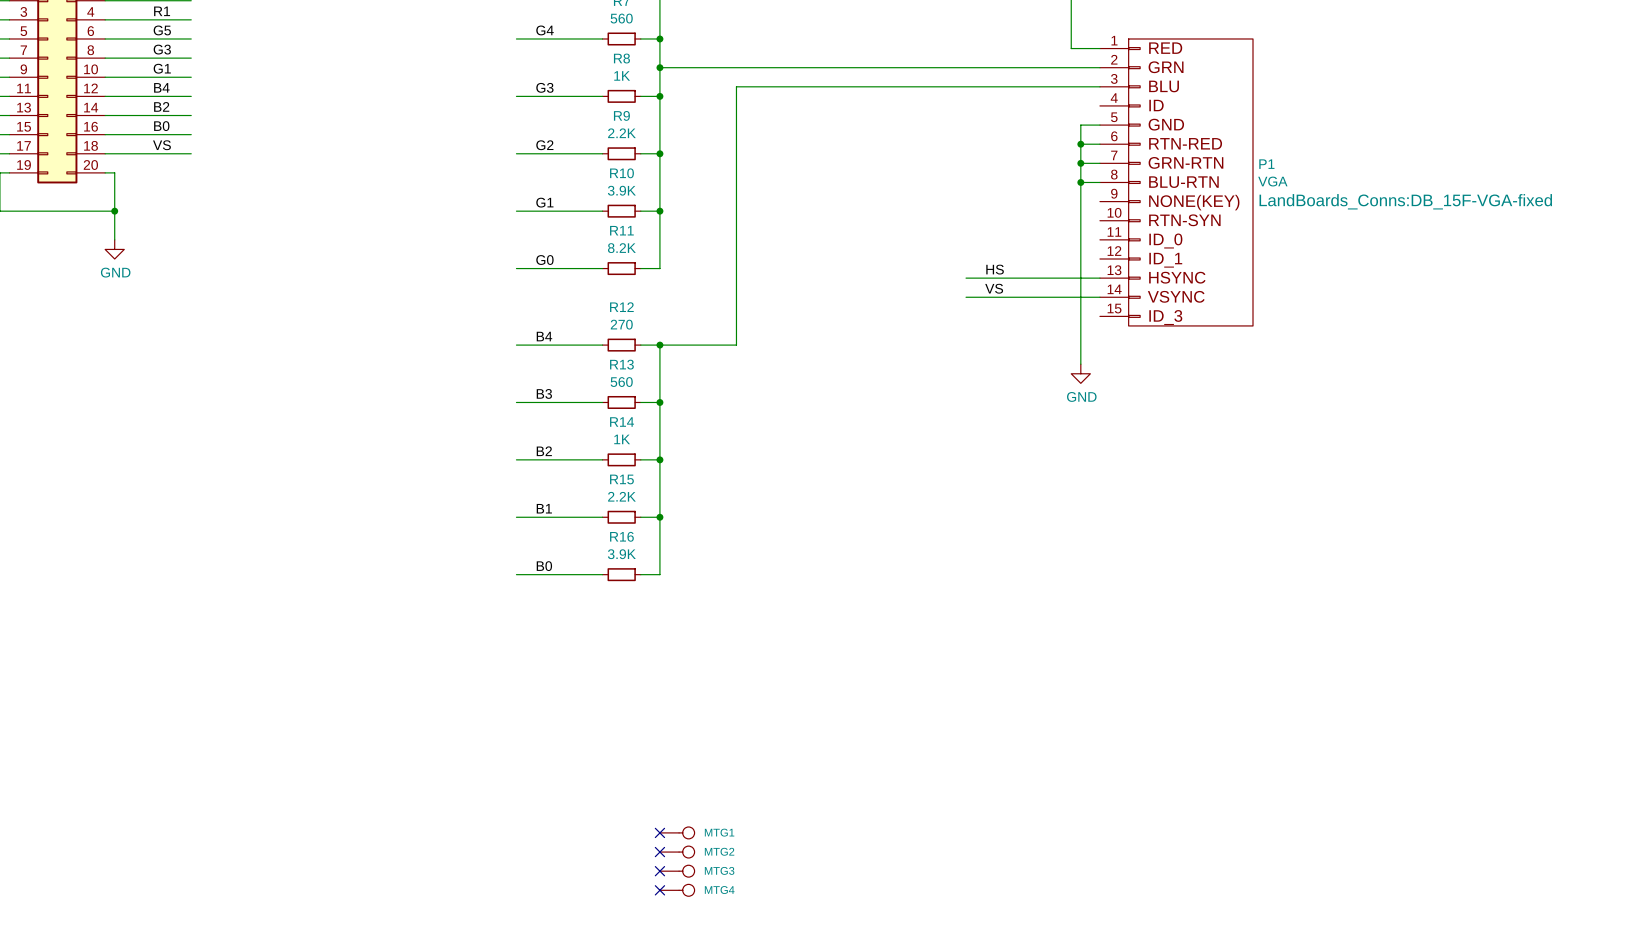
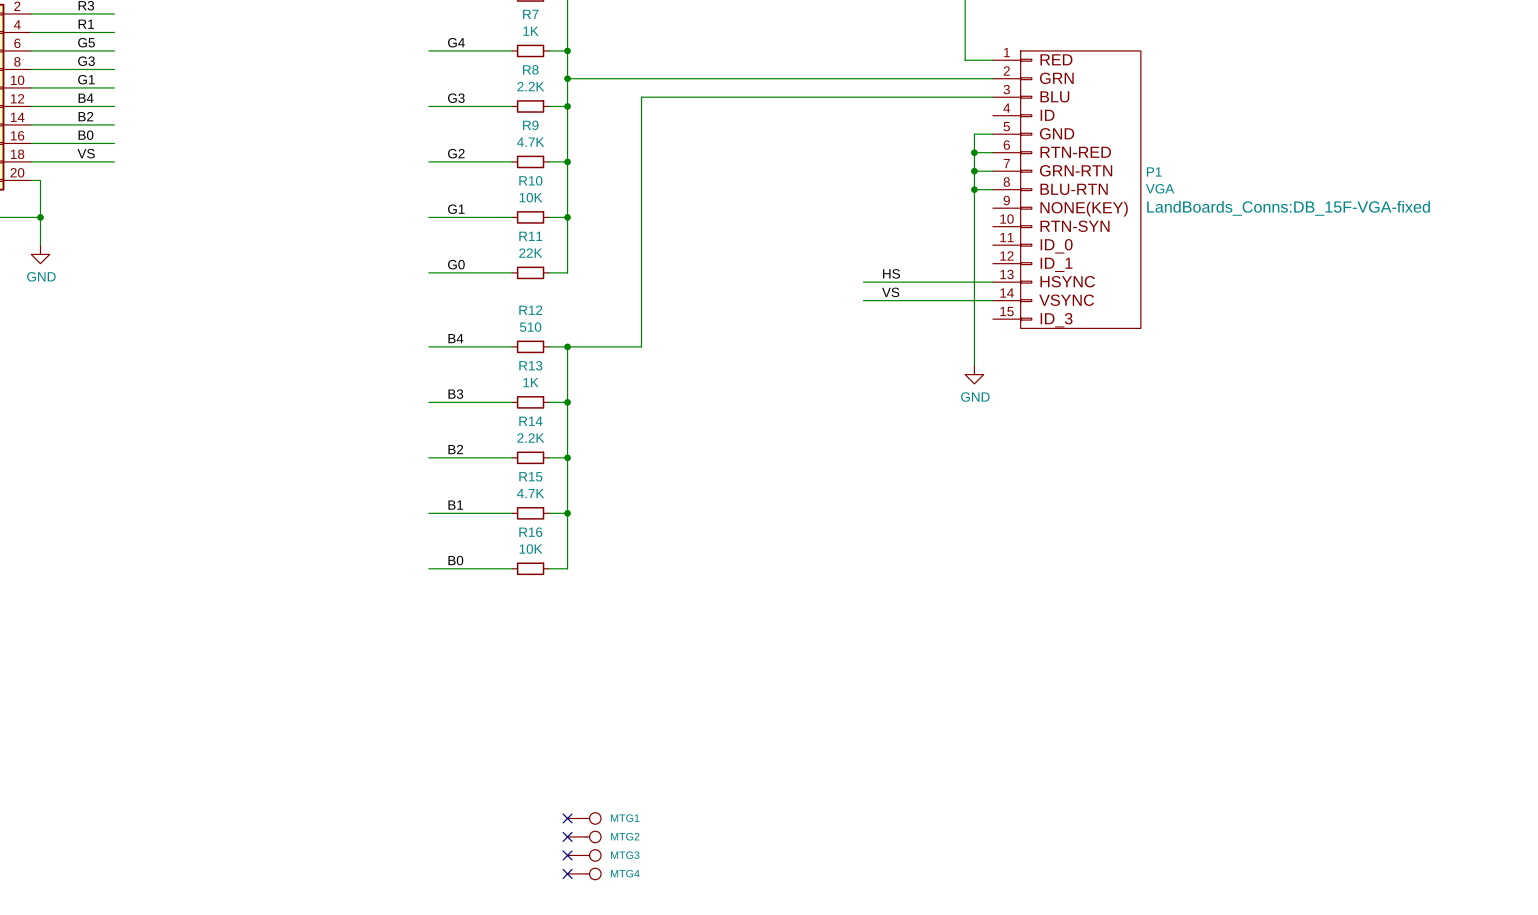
R7 value: 560 (621, 18) -> 1K (531, 31)
R8 value: 1K (622, 75) -> 2.2K (530, 86)
R9 value: 2.2K (621, 133) -> 4.7K (530, 142)
R10 value: 3.9K (621, 190) -> 10K (531, 197)
R11 value: 8.2K (621, 248) -> 22K (530, 253)
R12 value: 270 (621, 324) -> 510 (530, 327)
R13 value: 560 (621, 382) -> 1K (531, 382)
R14 value: 1K (622, 439) -> 2.2K (530, 438)
R15 value: 2.2K (621, 496) -> 4.7K (530, 493)
R16 value: 3.9K (621, 554) -> 10K (531, 549)

